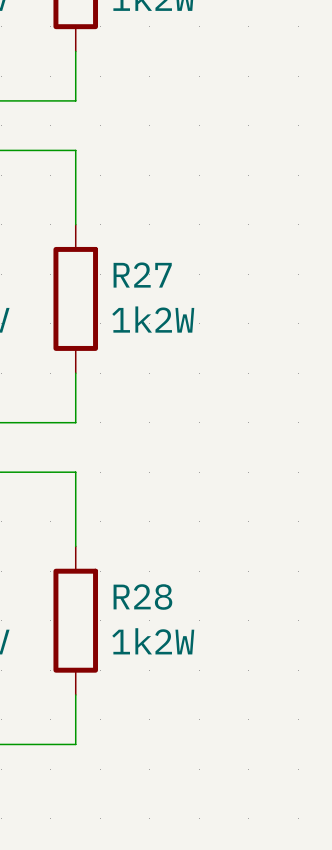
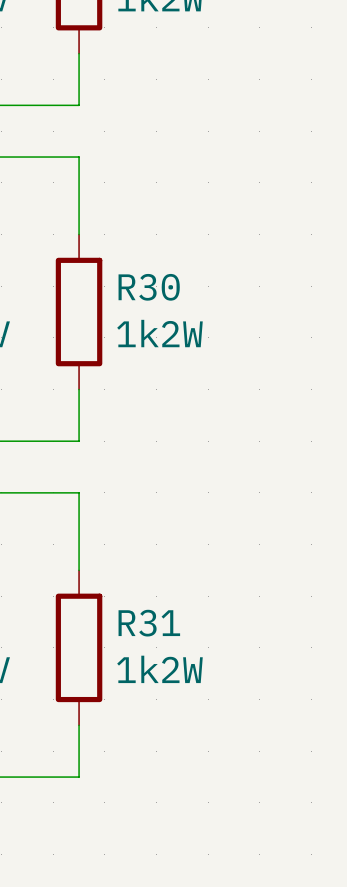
R27 name: R27 (142, 275) -> R30 (149, 287)
R28 name: R28 (142, 597) -> R31 (149, 623)

